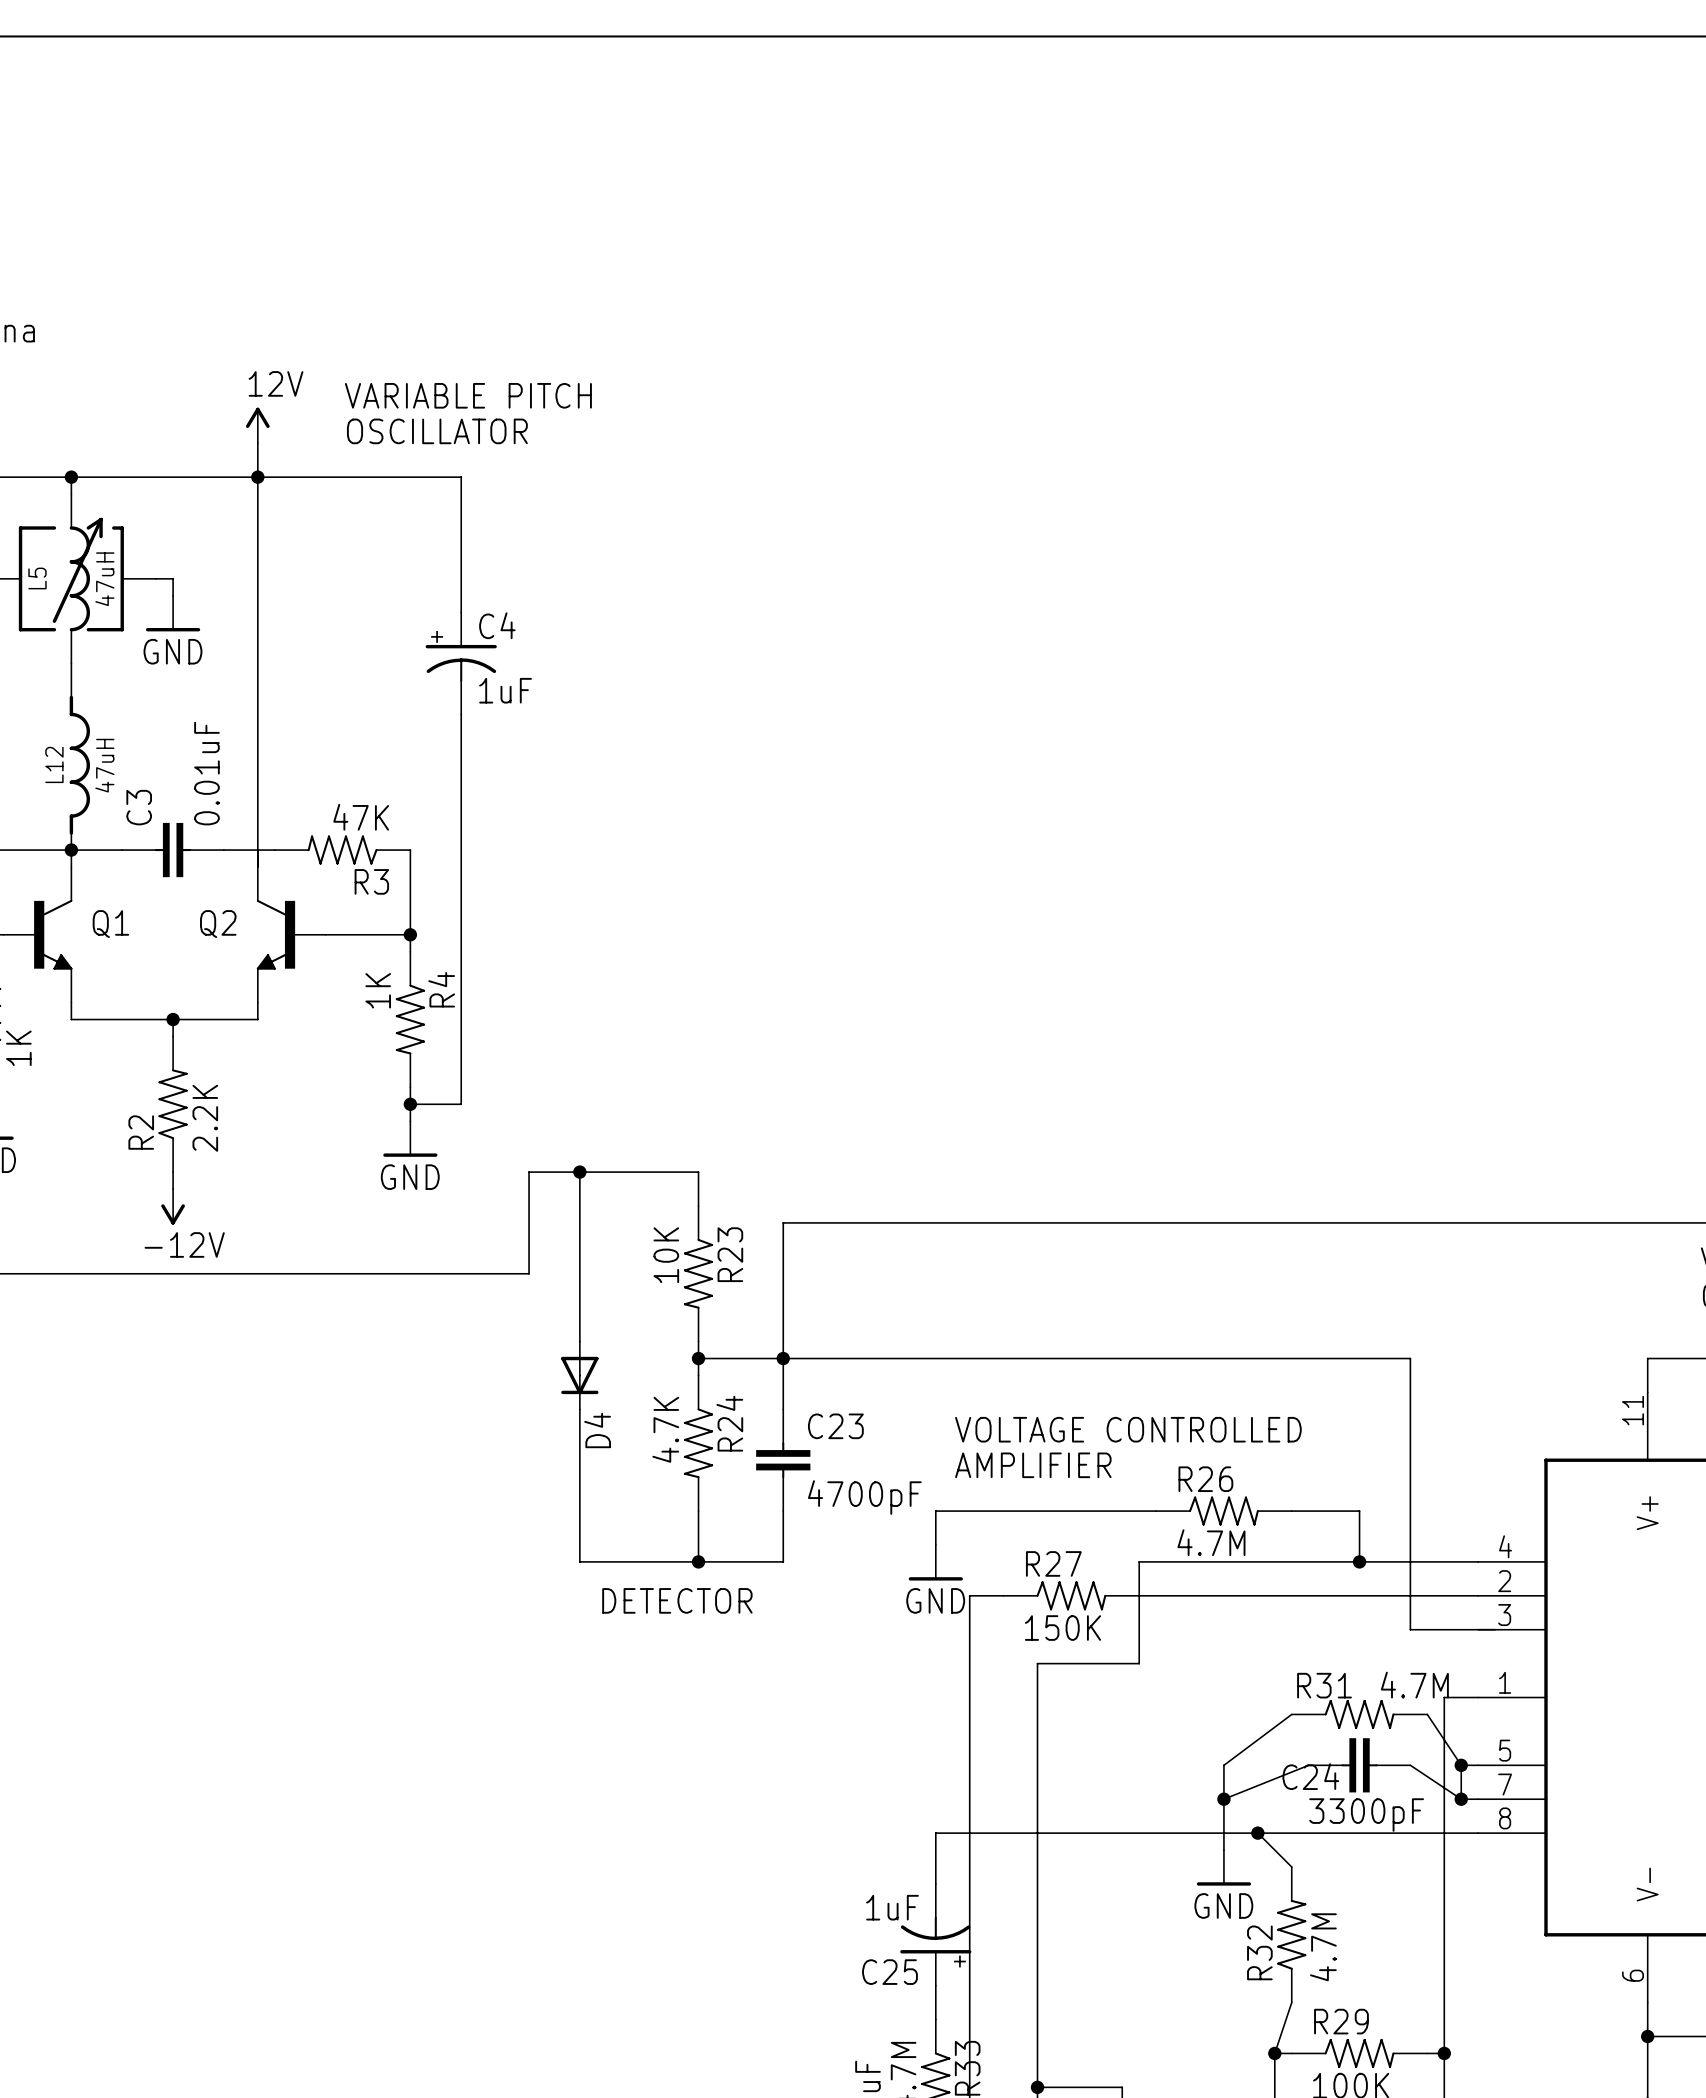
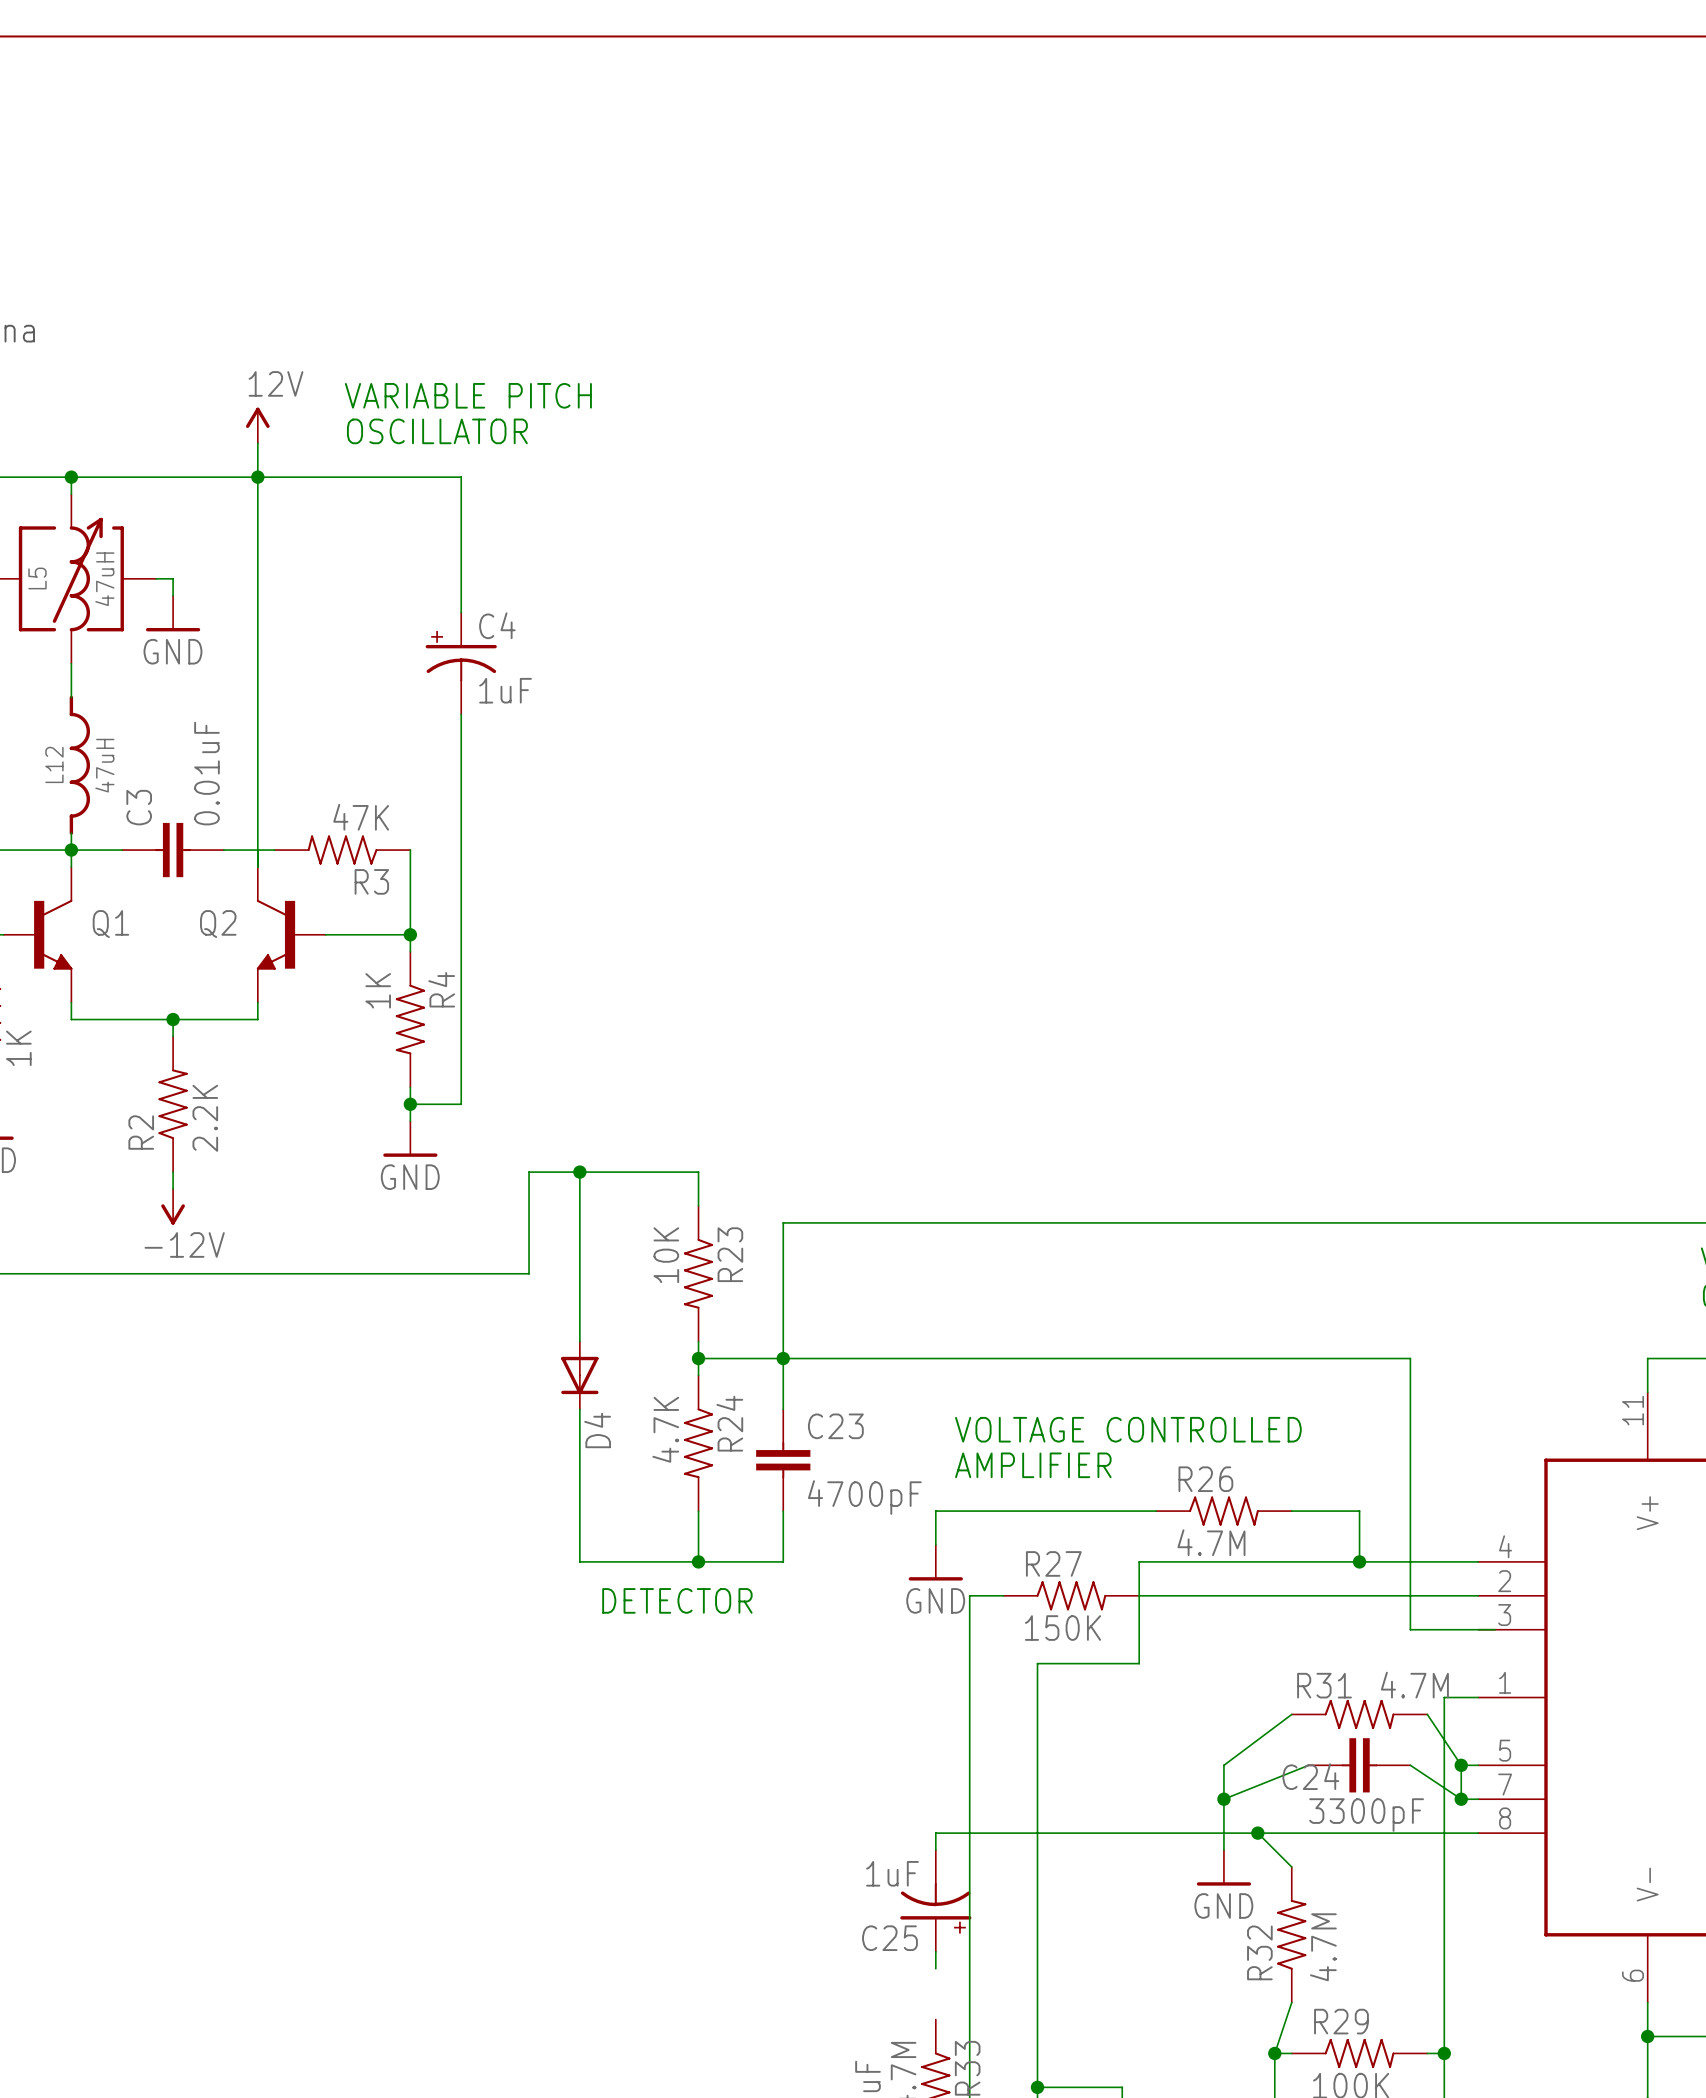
C25 position: (935, 1934) -> (935, 1900)
wire: (935, 1985) (935, 2019) -> none

